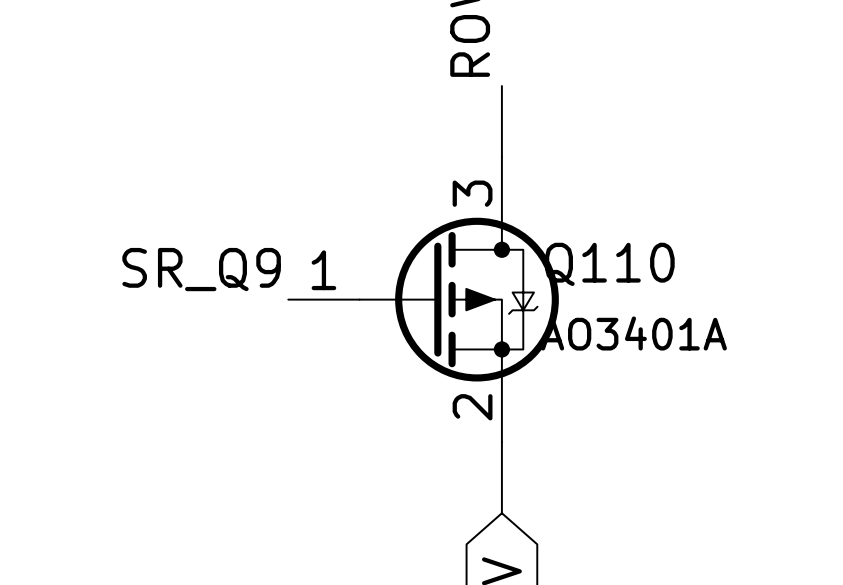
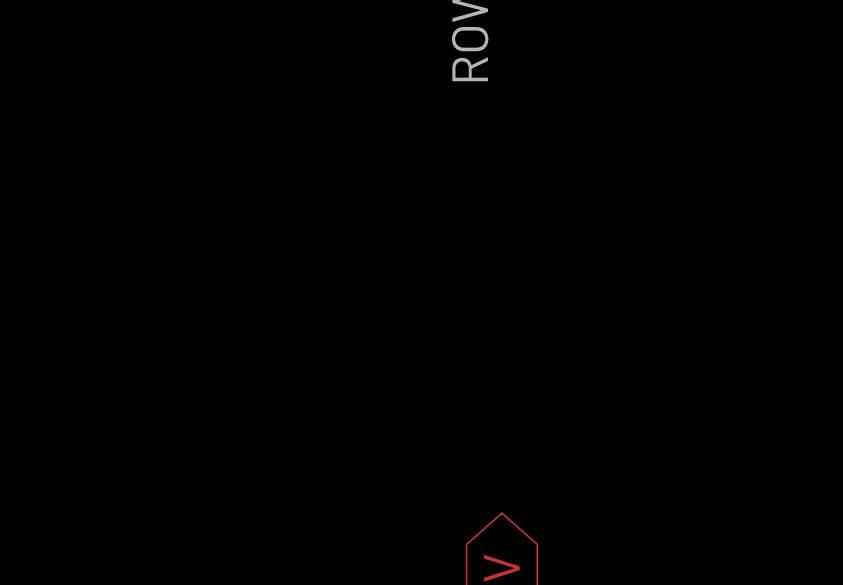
wire: (501, 86) (501, 157) -> none
label: SR_Q9 (201, 269) -> none
Q110: AO3401A (423, 299) -> none
wire: (501, 442) (501, 513) -> none

